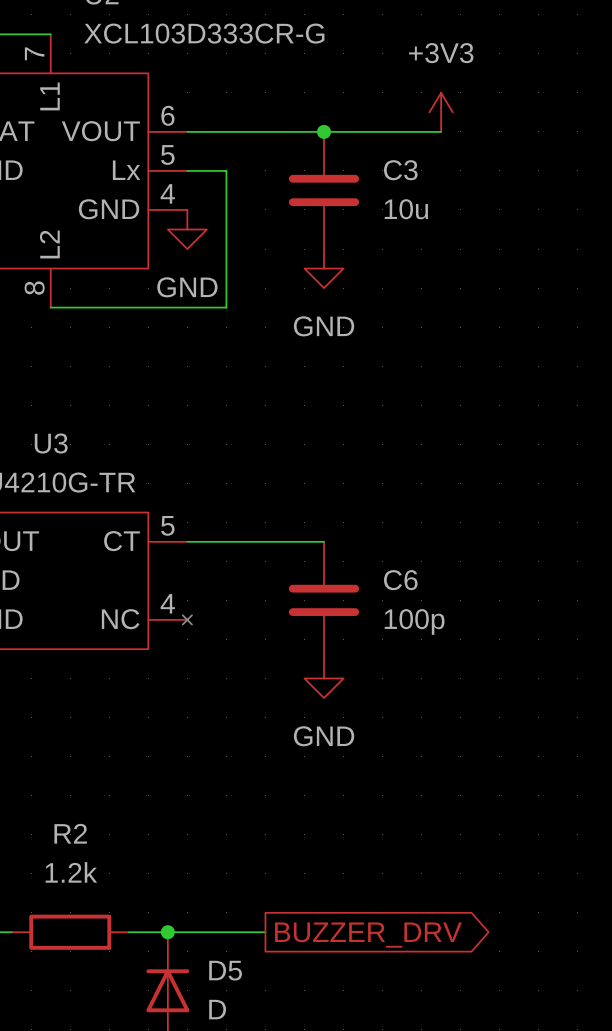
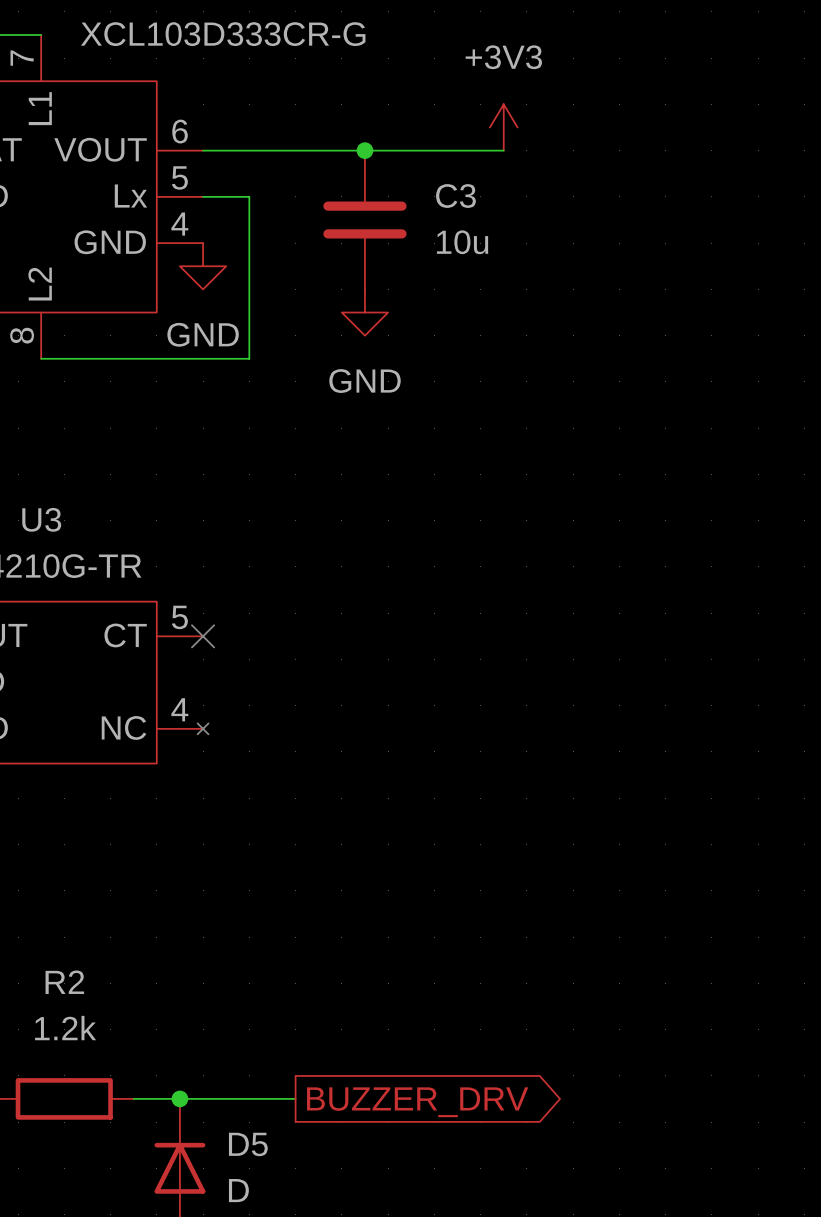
wire: (187, 541) (324, 541) -> none
no-connect mark: none -> (203, 636)
C6: 100p (324, 600) -> none
power symbol: GND (324, 678) -> none

